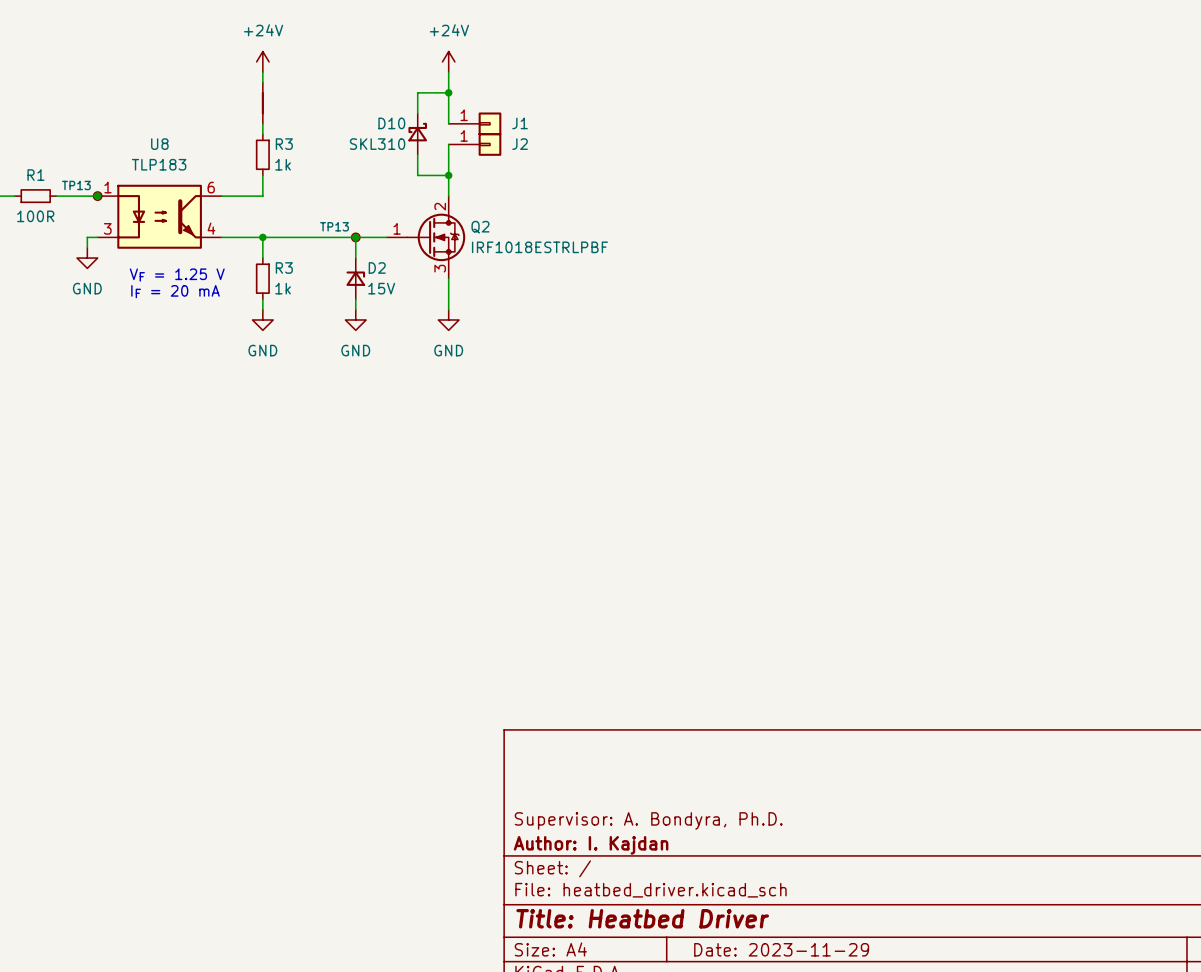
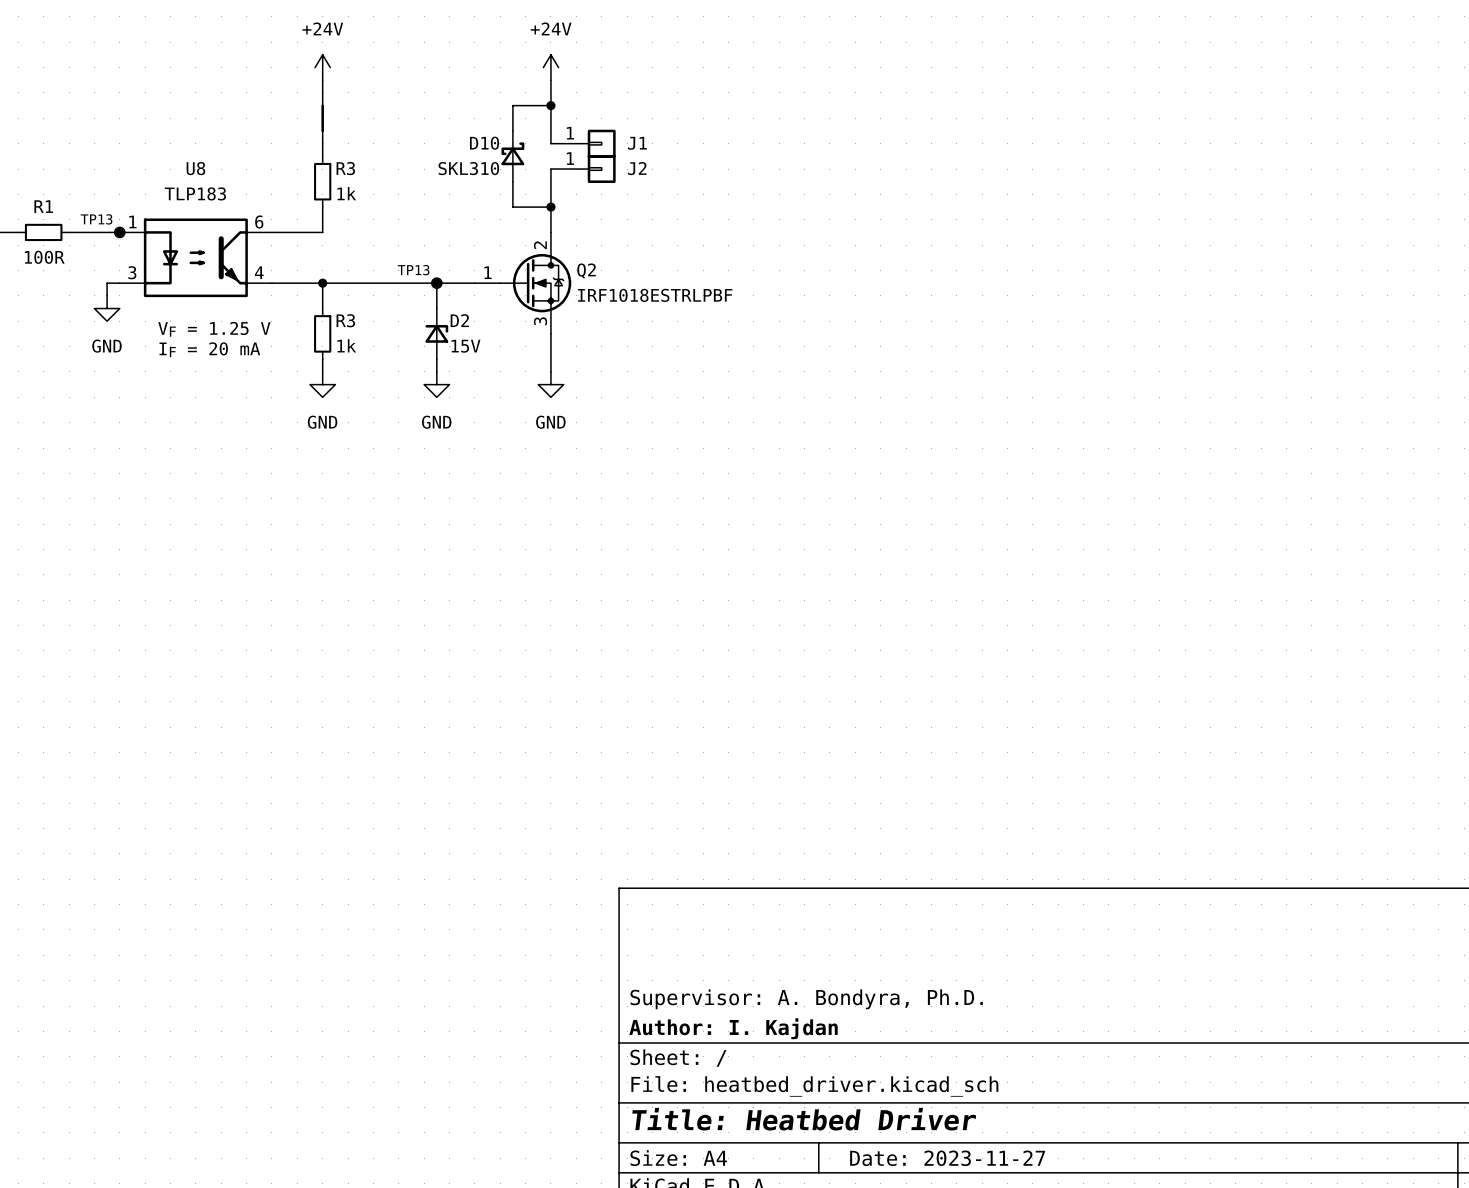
title block: Date: 2023-11-29 (781, 949) -> Date: 2023-11-27 (947, 1158)

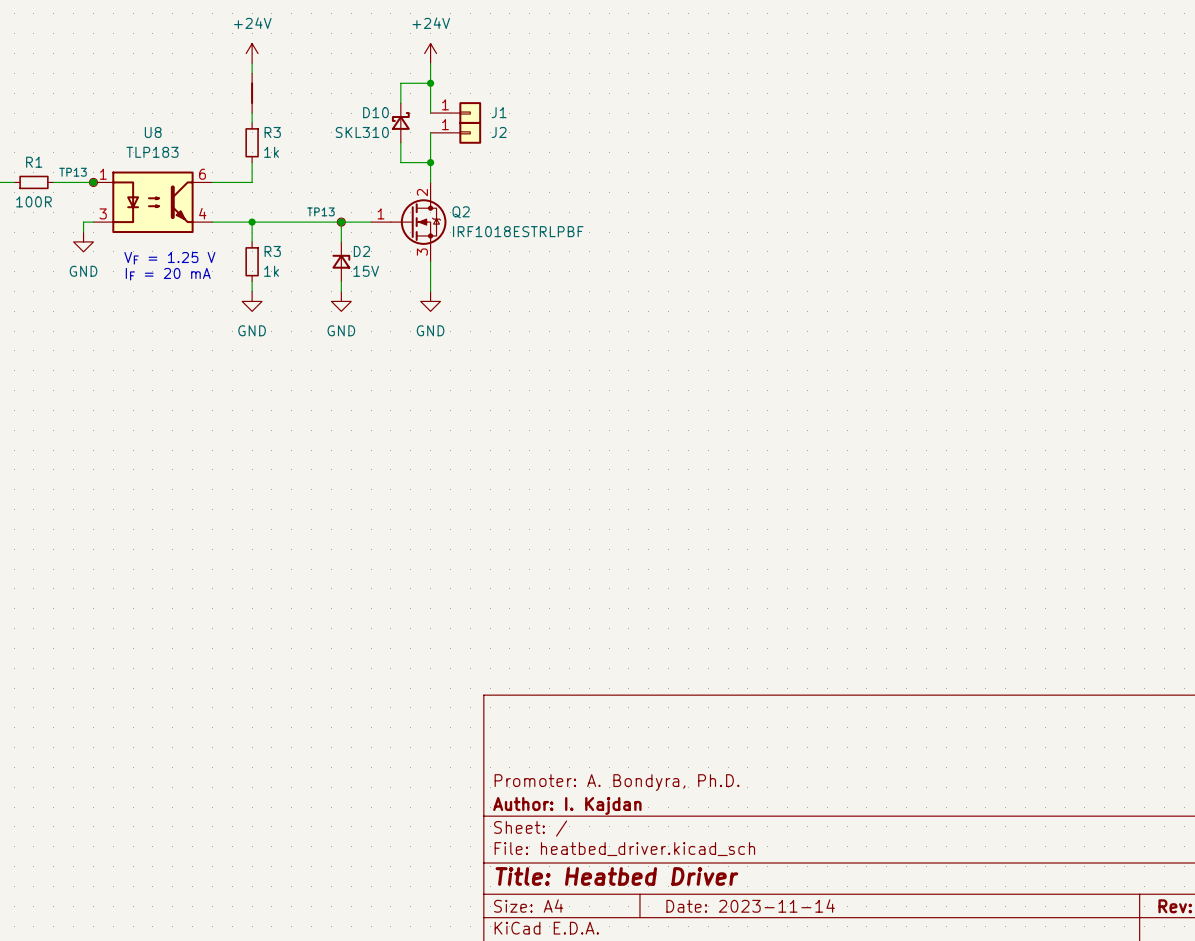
title block: Supervisor: A. Bondyra, Ph.D. (806, 999) -> Promoter: A. Bondyra, Ph.D. (617, 782)
title block: Date: 2023-11-27 (947, 1158) -> Date: 2023-11-14 (750, 906)

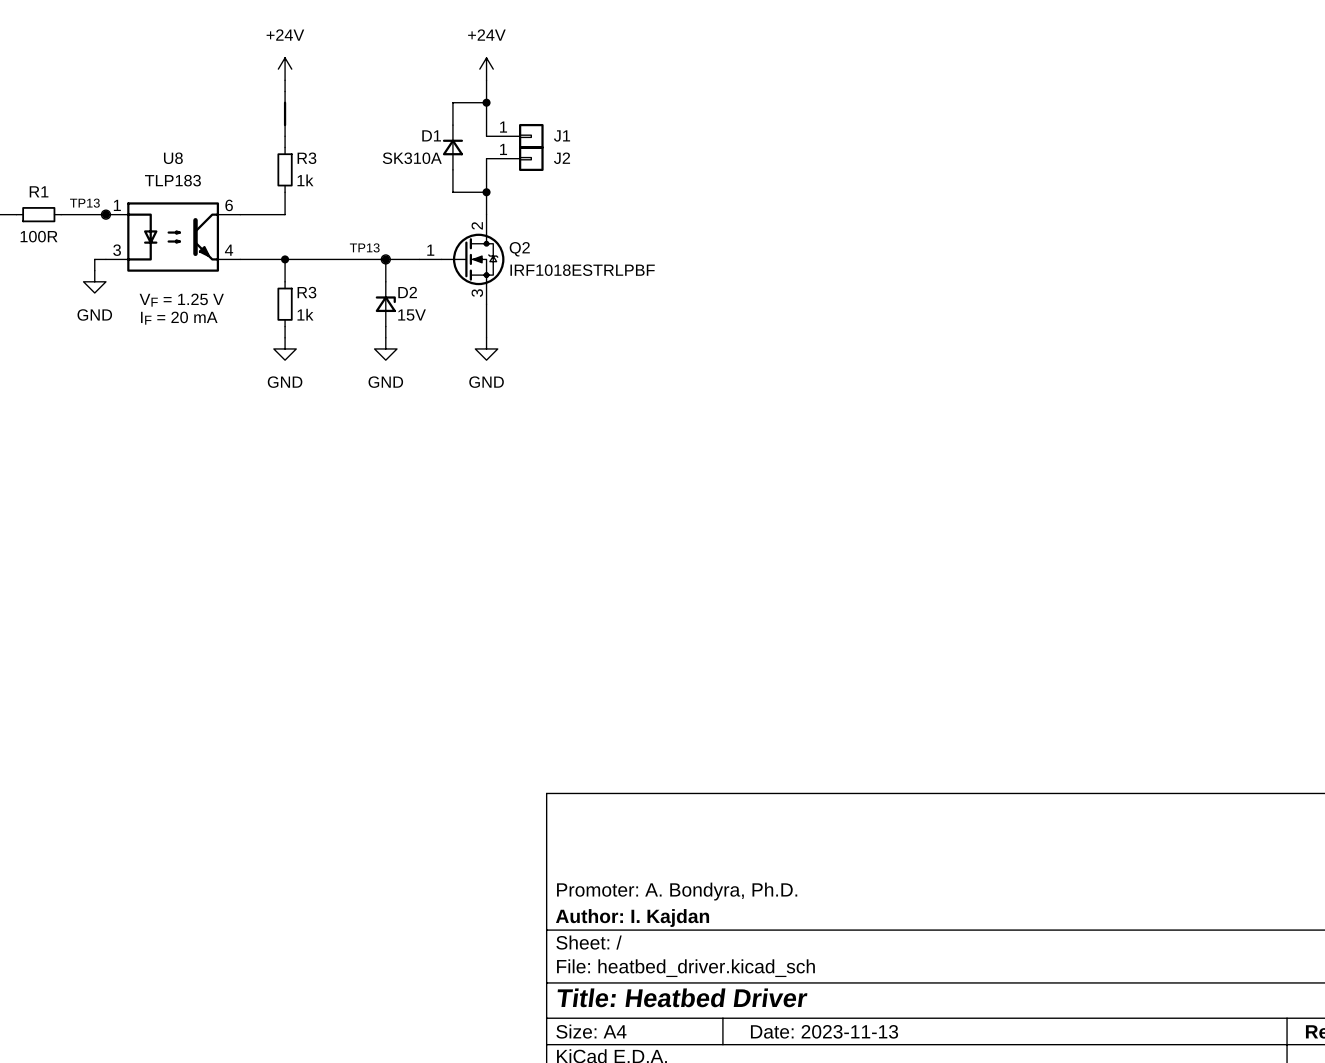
D10: SKL310 (400, 122) -> none
D1: none -> SK310A (452, 147)
title block: Date: 2023-11-14 (750, 906) -> Date: 2023-11-13 (824, 1031)

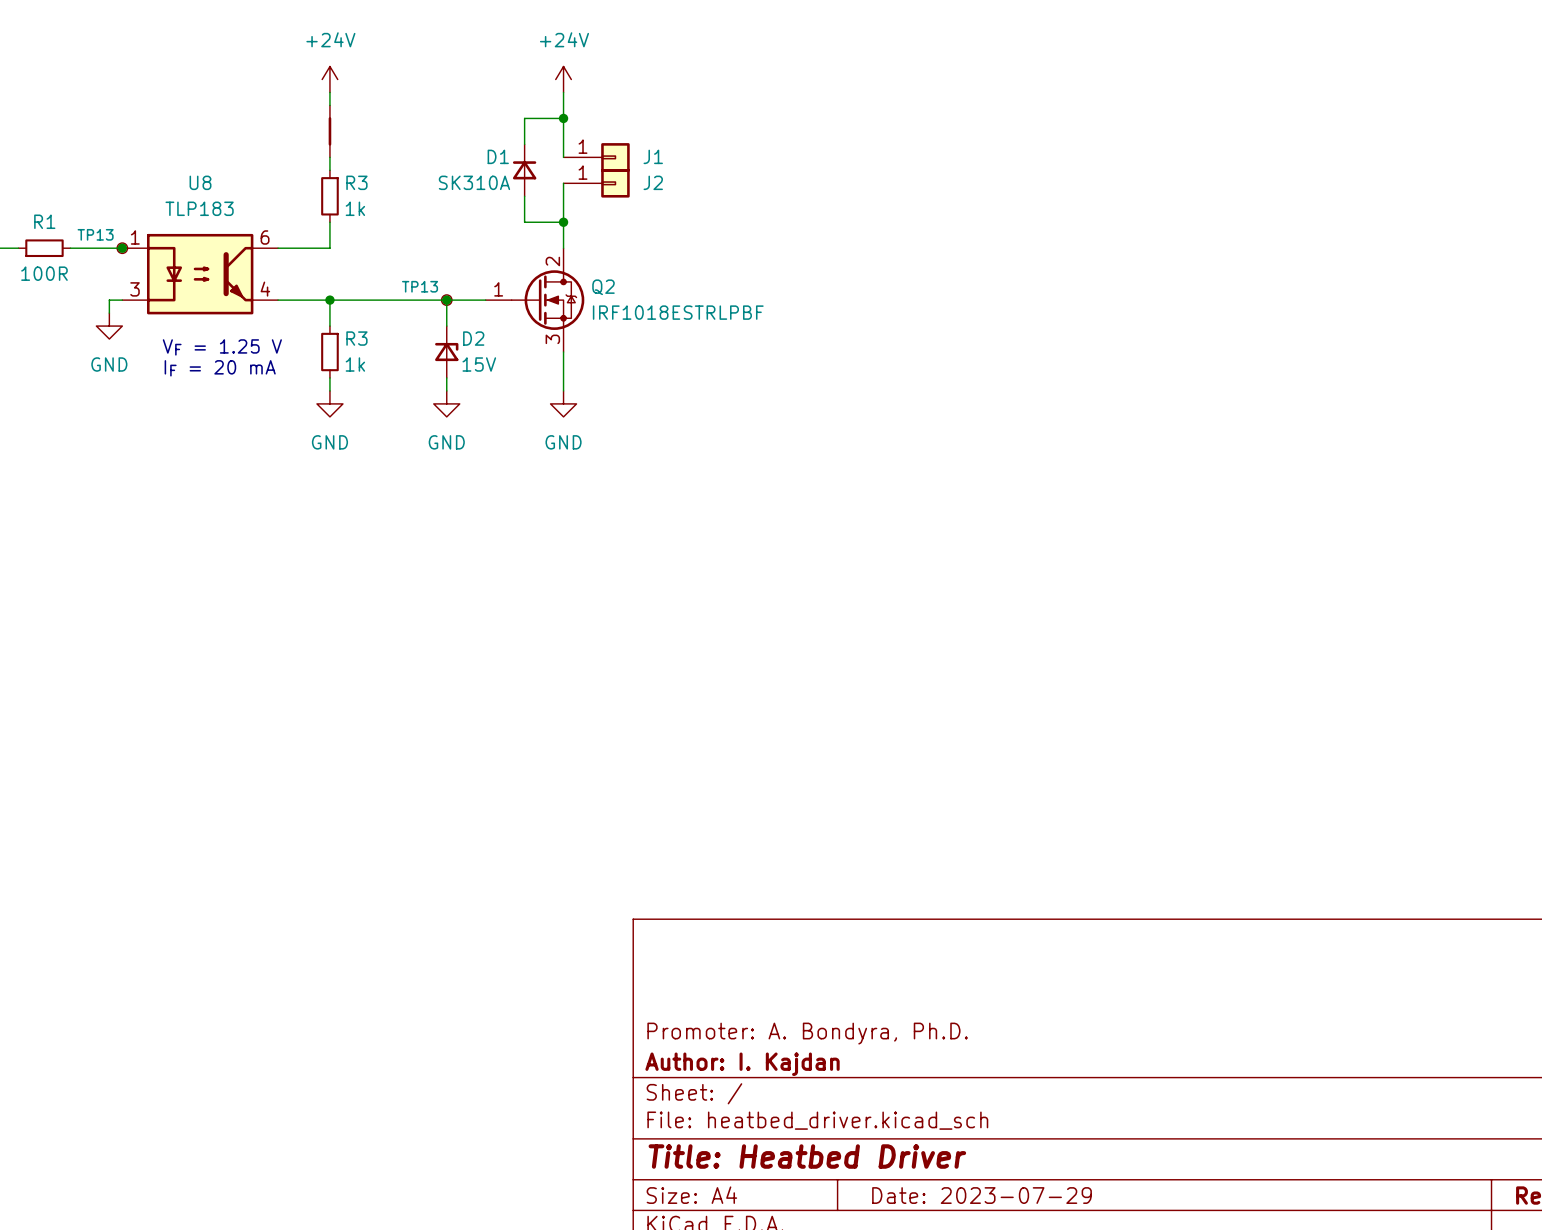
title block: Date: 2023-11-13 (824, 1031) -> Date: 2023-07-29 (982, 1195)

